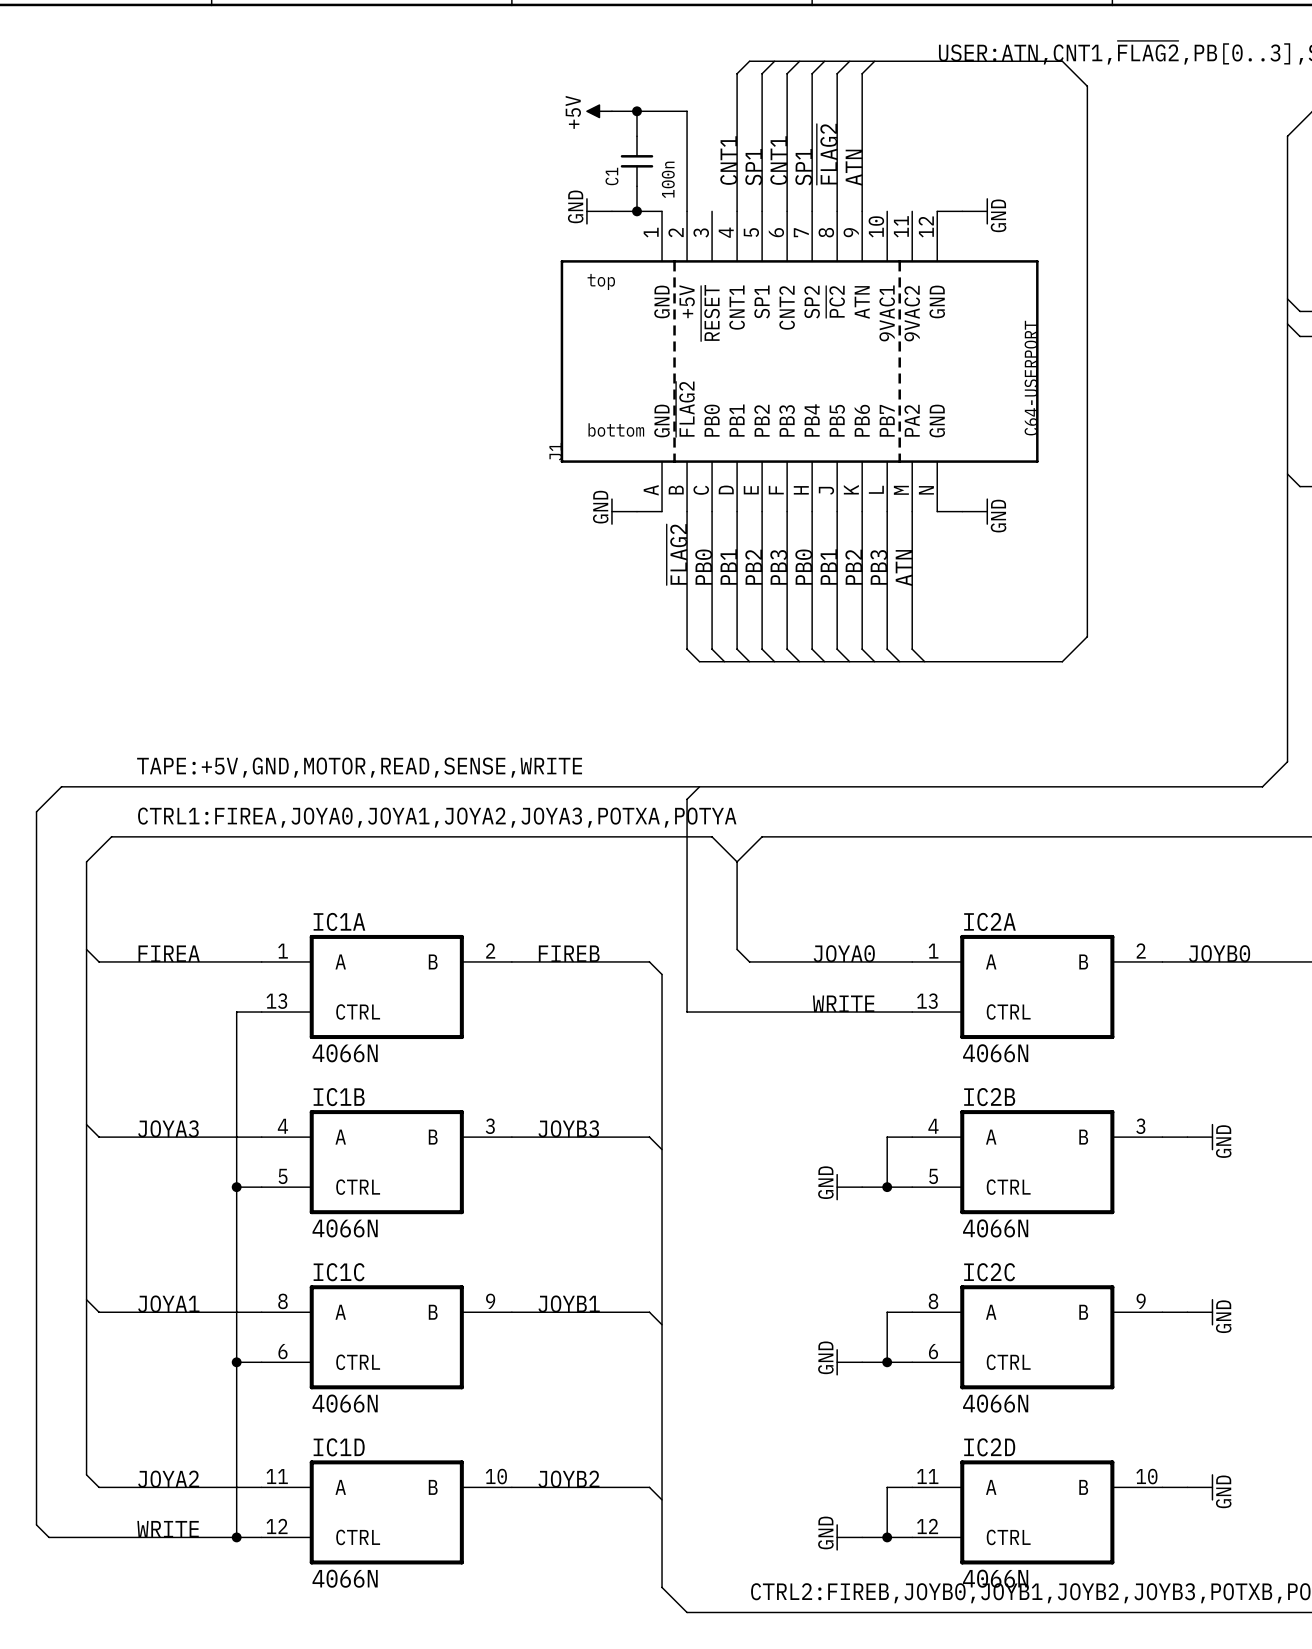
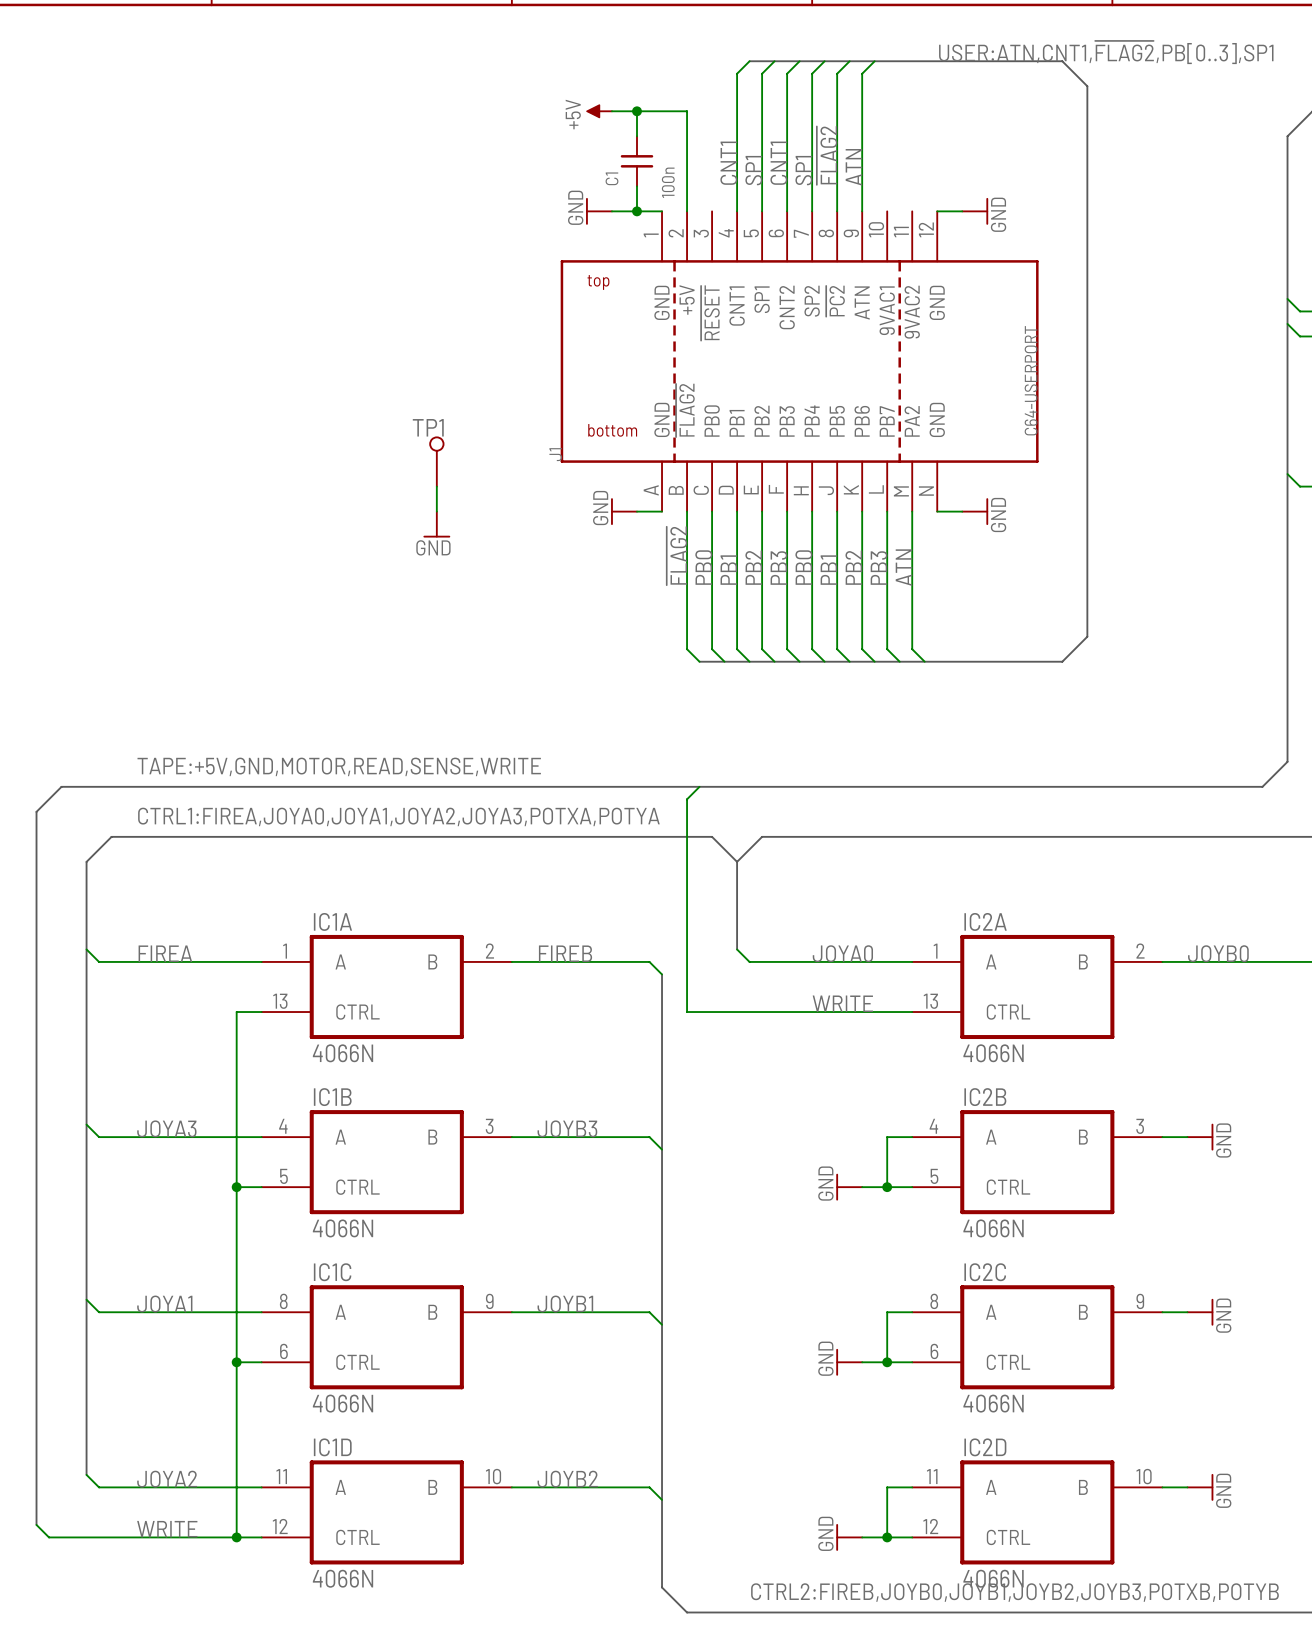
TP1: none -> (436, 461)
wire: none -> (436, 486) (436, 511)
power symbol: none -> GND (436, 524)

